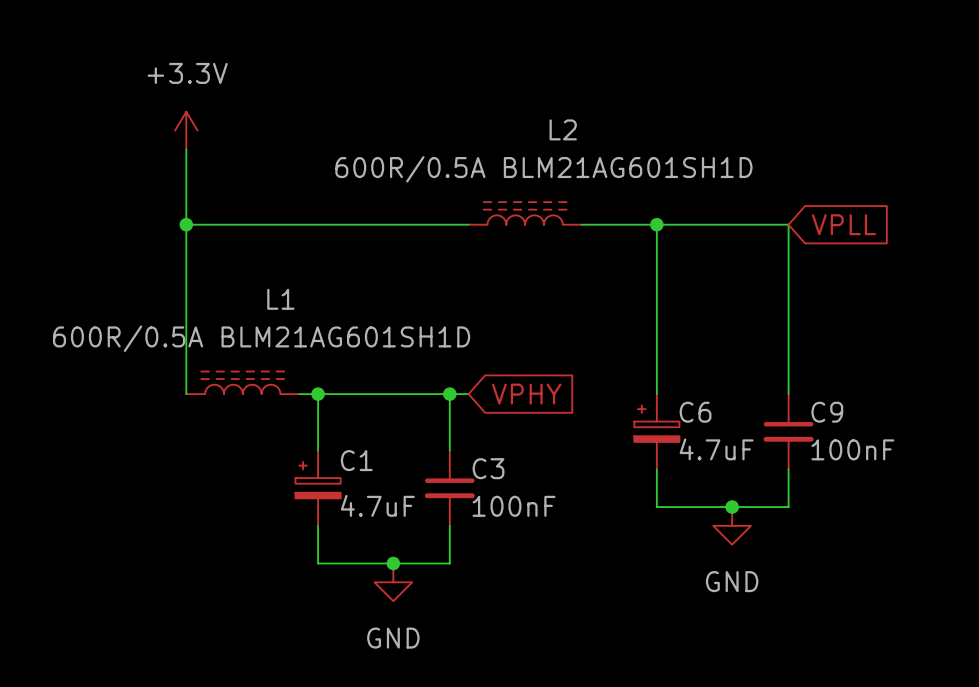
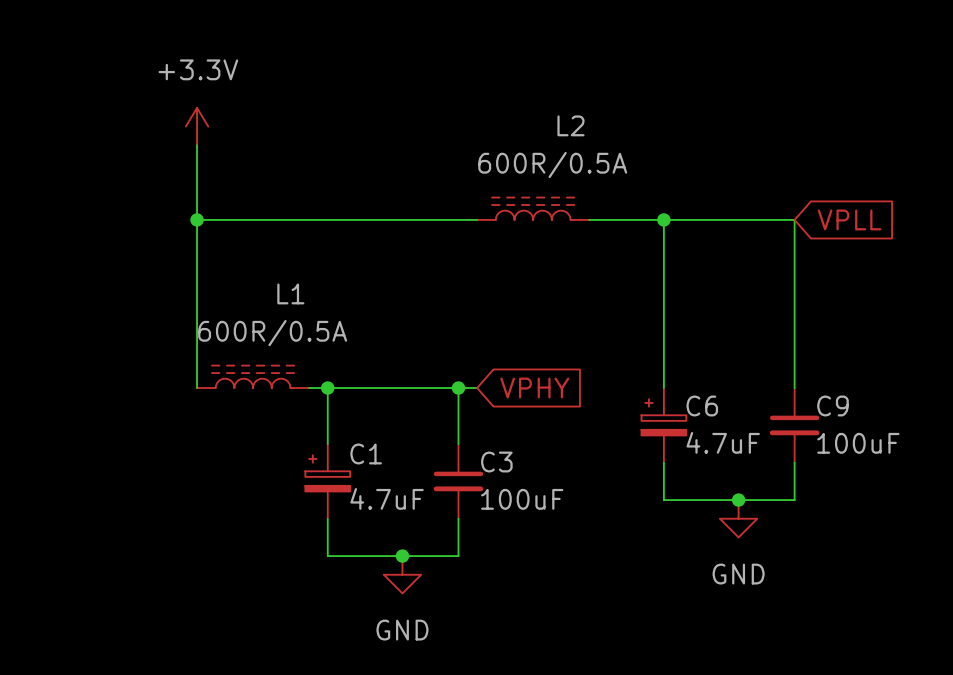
L2 value: 600R/0.5A BLM21AG601SH1D (543, 169) -> 600R/0.5A (552, 165)
L1 value: 600R/0.5A BLM21AG601SH1D (261, 338) -> 600R/0.5A (272, 333)
C9 value: 100nF (852, 449) -> 100uF (858, 443)
C3 value: 100nF (514, 506) -> 100uF (522, 499)

